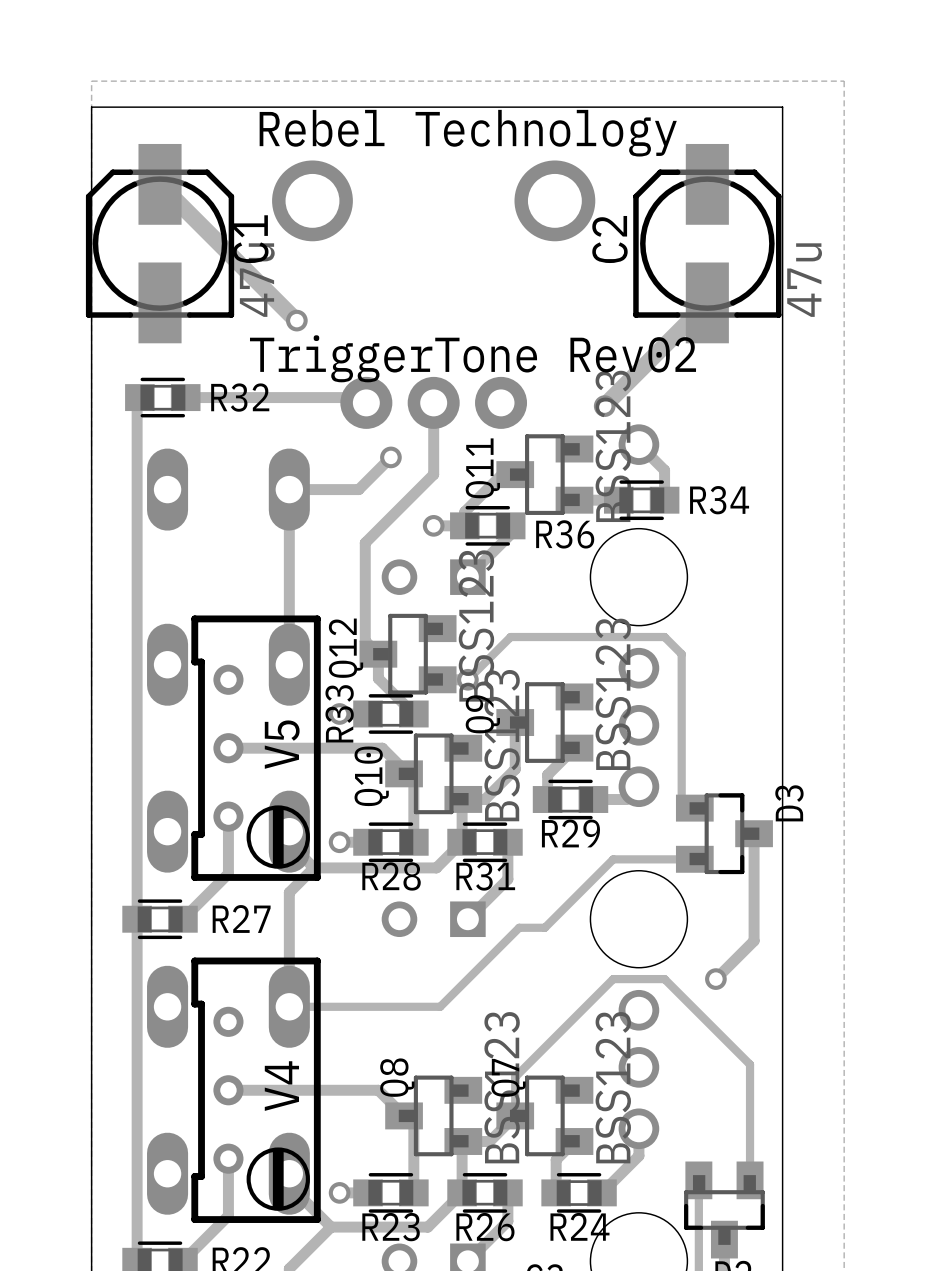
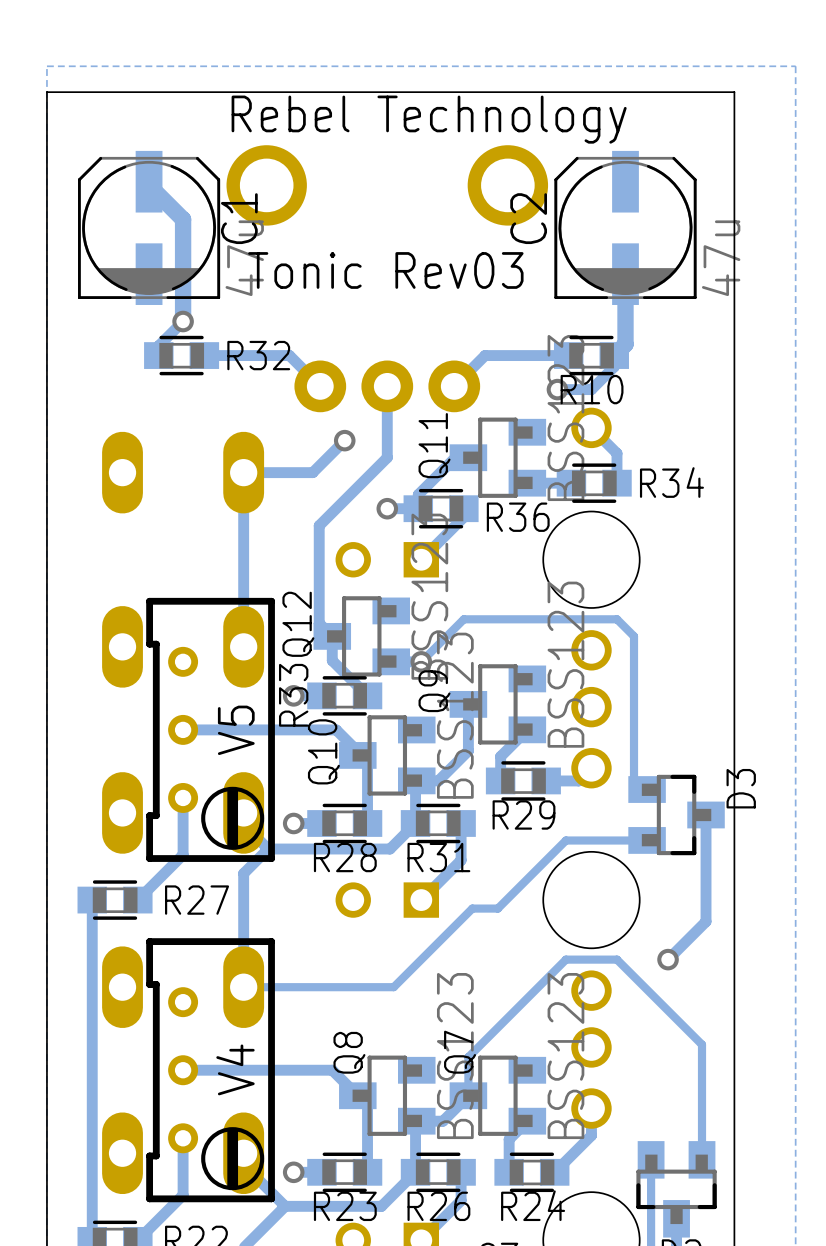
C1 footprint: [85, 143, 235, 344] -> [78, 150, 221, 305]
C2 footprint: [633, 143, 782, 344] -> [554, 150, 697, 305]
track: (160, 184) (296, 320) -> none
track: none -> (149, 181) (149, 185) (183, 219) (183, 321) (158, 345) (158, 355)
text: none -> Tonic Rev03 (385, 270)
track: (707, 302) (604, 405) -> (625, 274) (625, 344) (614, 355) (614, 366) (591, 389) (557, 389)
via position: (296, 320) -> (183, 321)
text: TriggerTone Rev02 (473, 358) -> none
track: none -> (568, 355) (485, 355) (454, 386)
R10: none -> (591, 355)
track: (139, 397) (137, 400) (137, 919) -> none
R32 position: (162, 397) -> (181, 355)
track: (361, 397) (185, 397) -> (315, 381) (289, 355) (204, 355)

